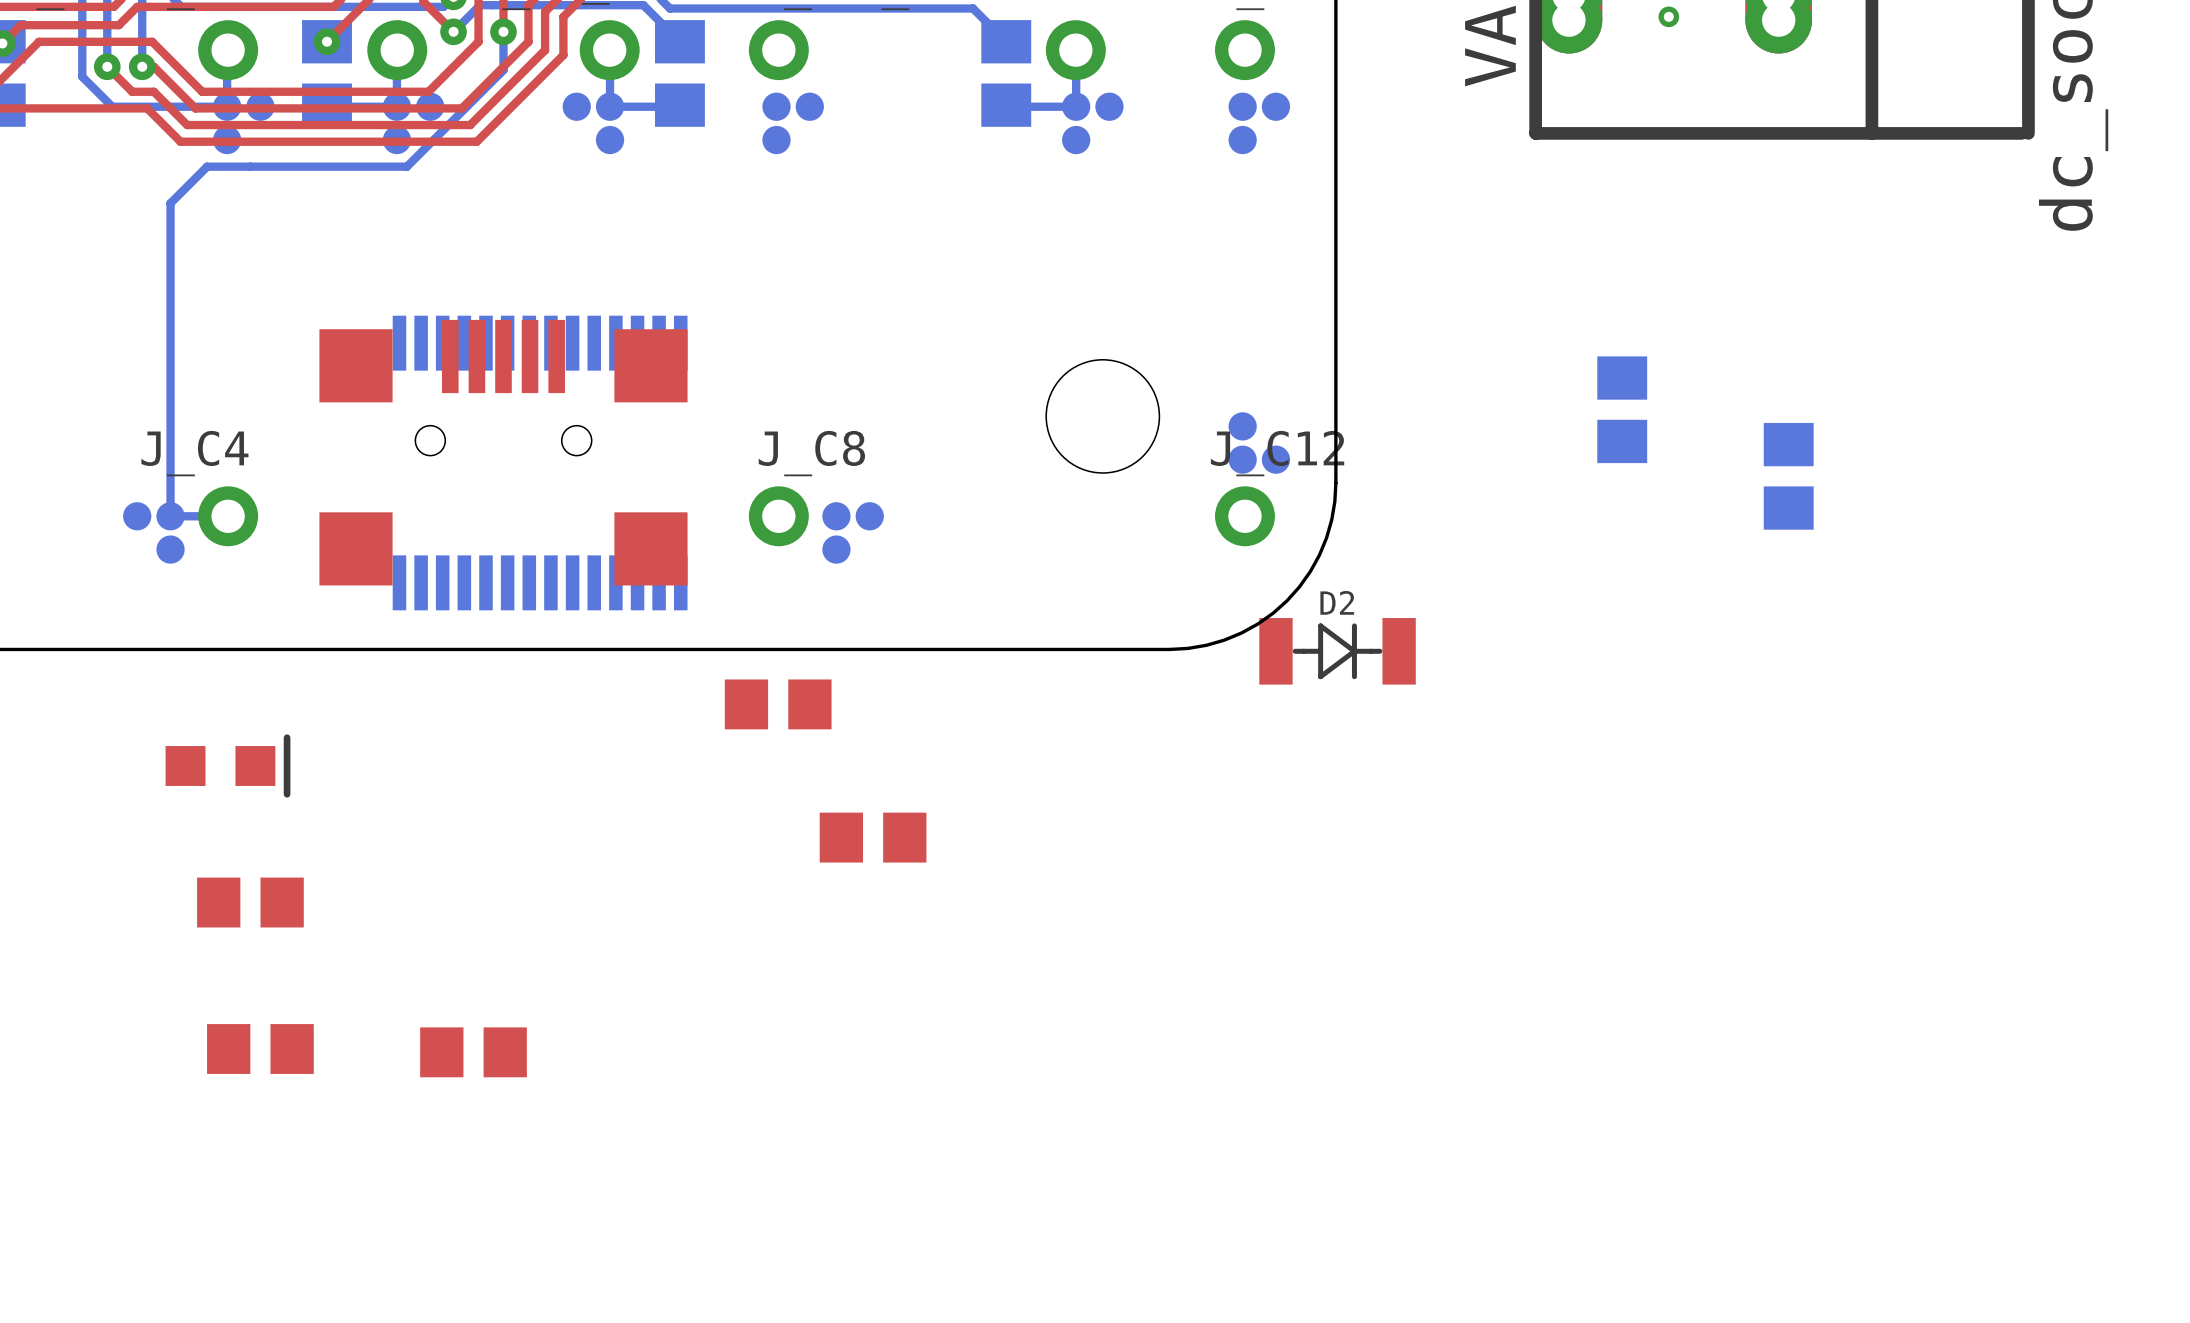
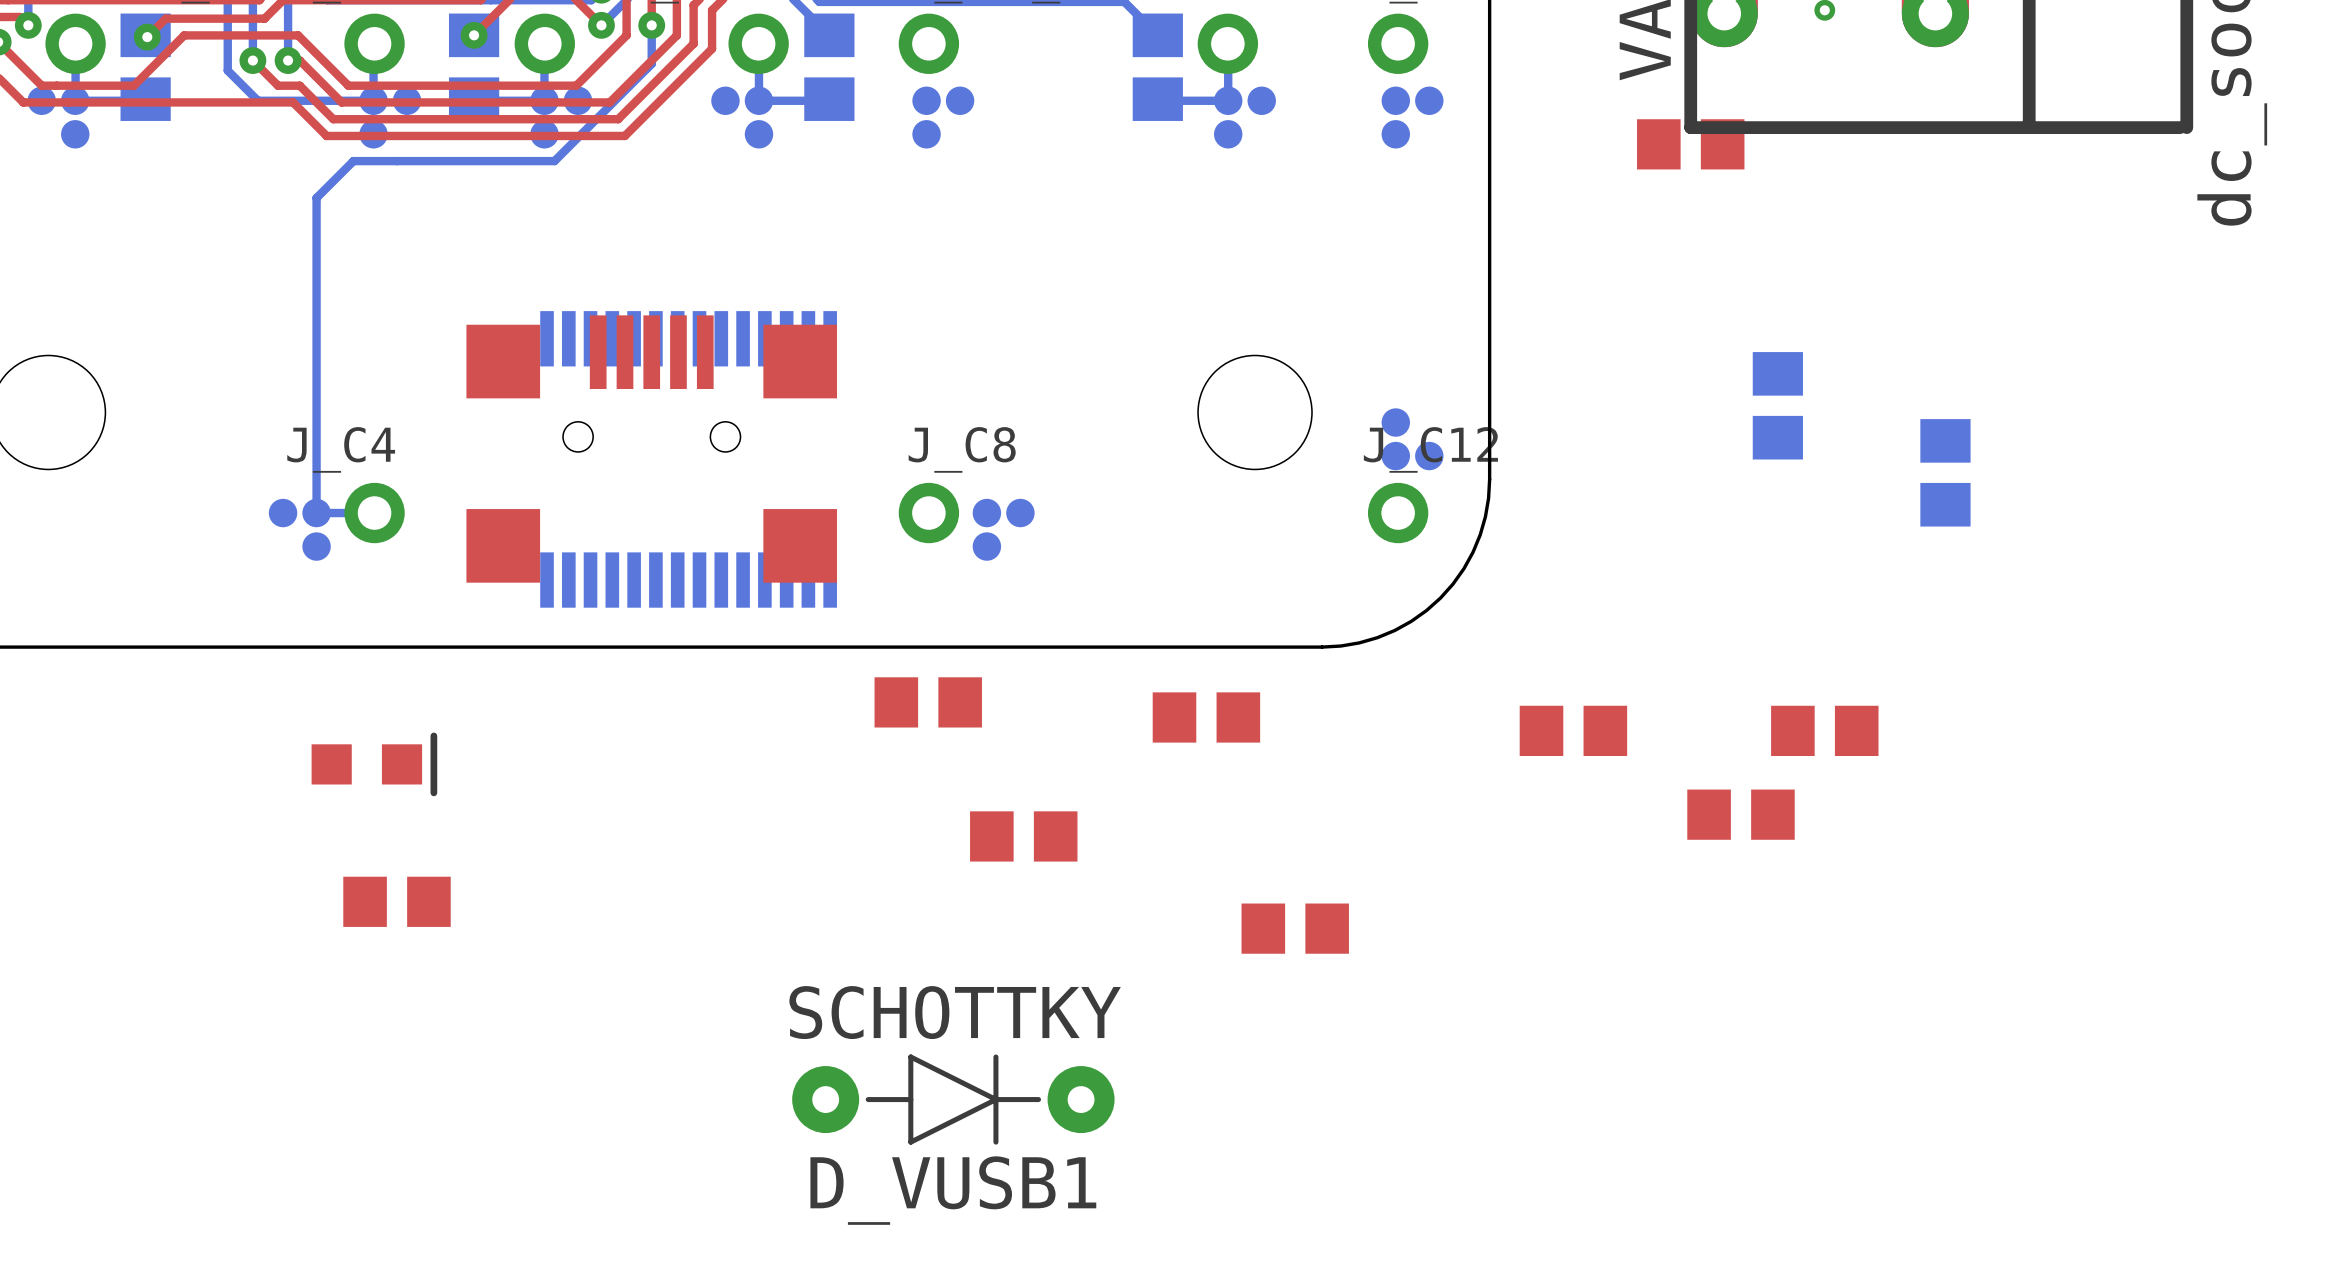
part: none -> (1690, 144)
D2: (1337, 651) -> none
part: none -> (1206, 717)
part: none -> (1573, 730)
part: none -> (1824, 730)
part: none -> (1741, 814)
part: none -> (1295, 928)
part: (260, 1049) -> none
part: (473, 1052) -> none
D_VUSB1: none -> SCHOTTKY (953, 1099)

